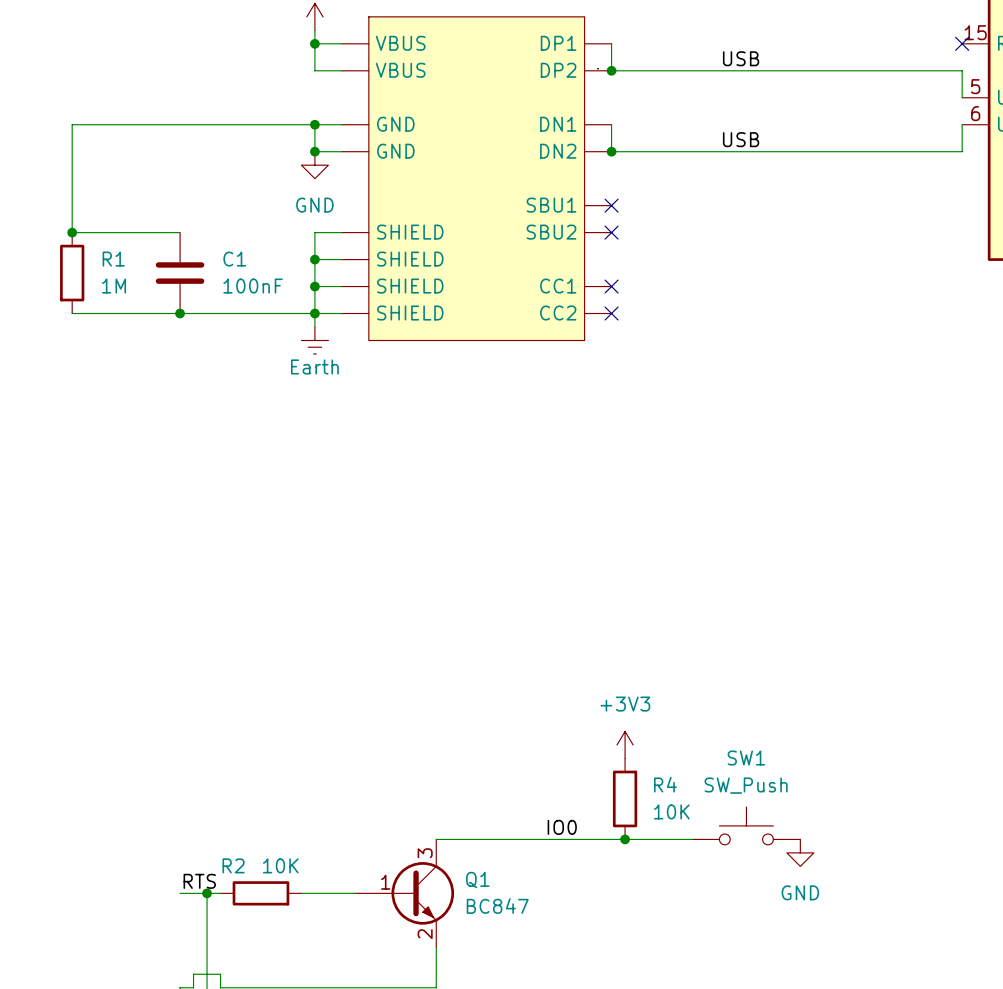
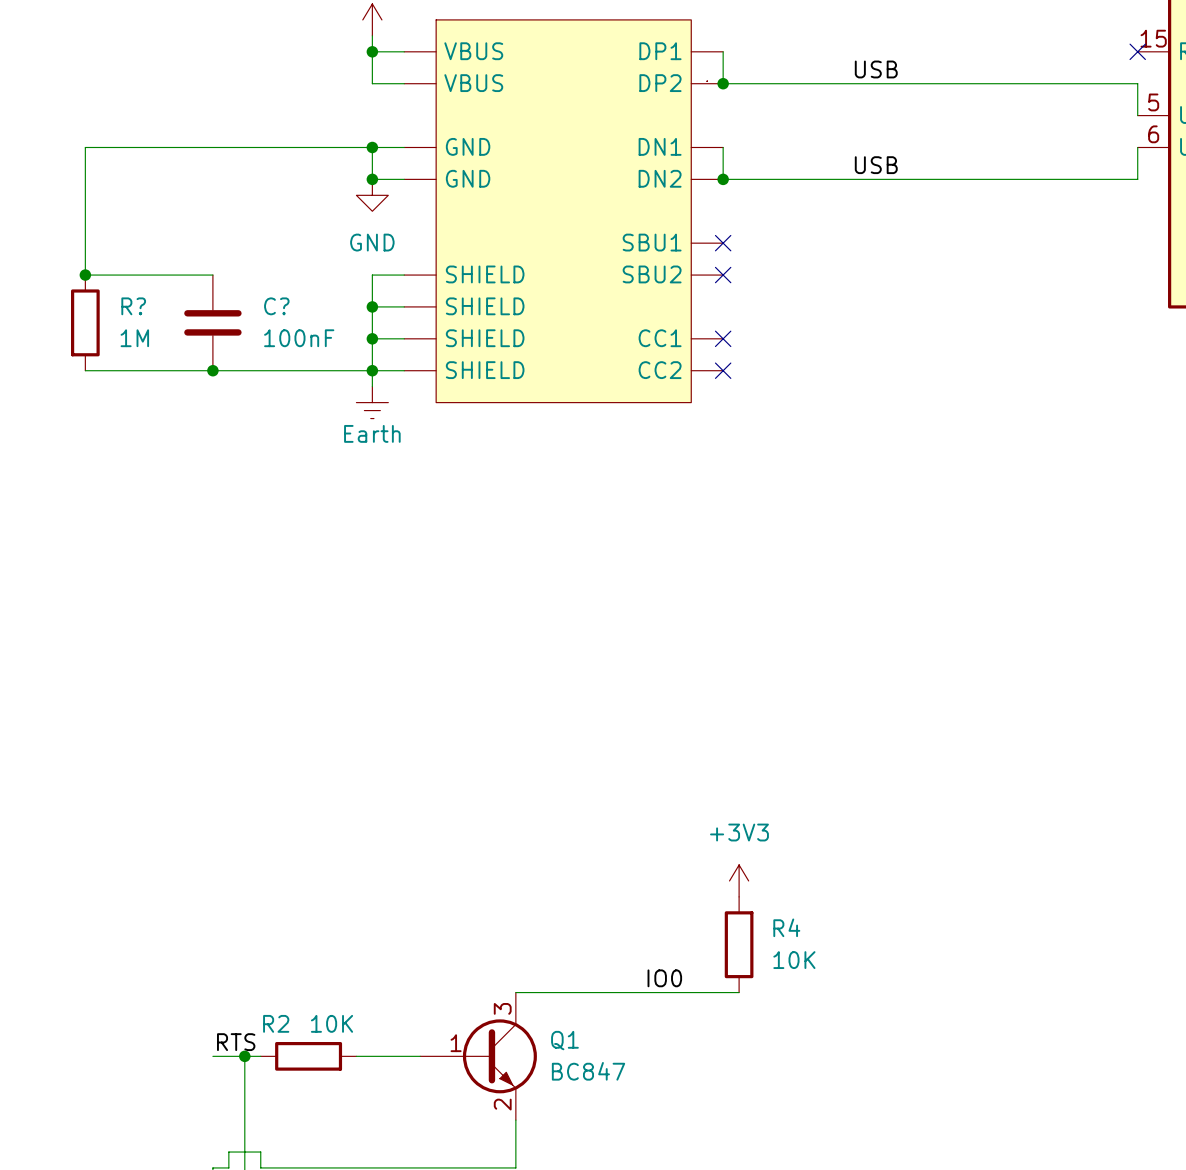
R1 name: R1 (113, 259) -> R? (133, 306)
C1 name: C1 (234, 259) -> C? (276, 306)
SW1: SW_Push (746, 825) -> none
wire: (625, 839) (692, 839) -> none
junction: (625, 839) -> none
power symbol: GND (800, 852) -> none

